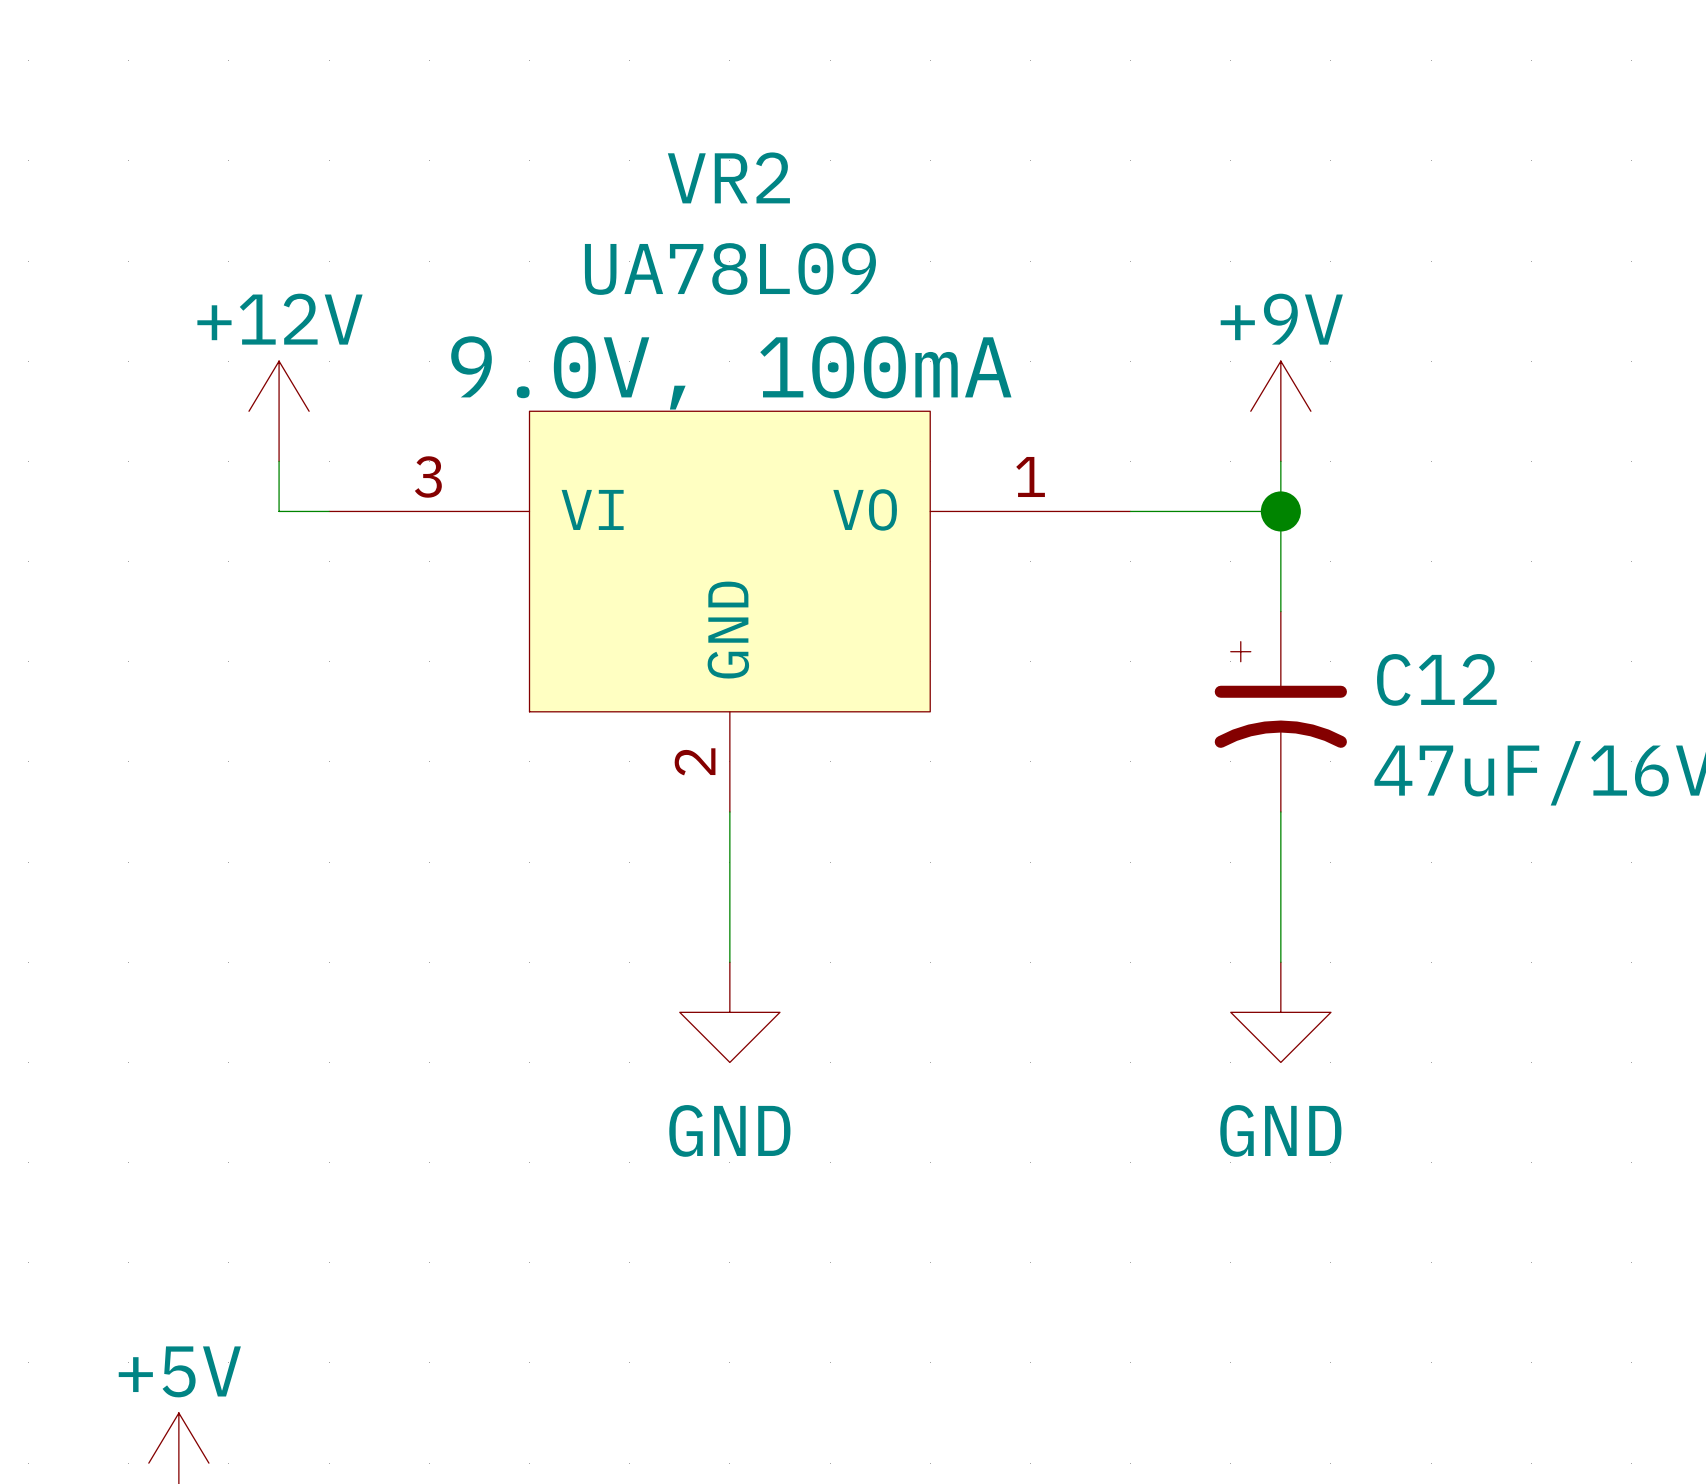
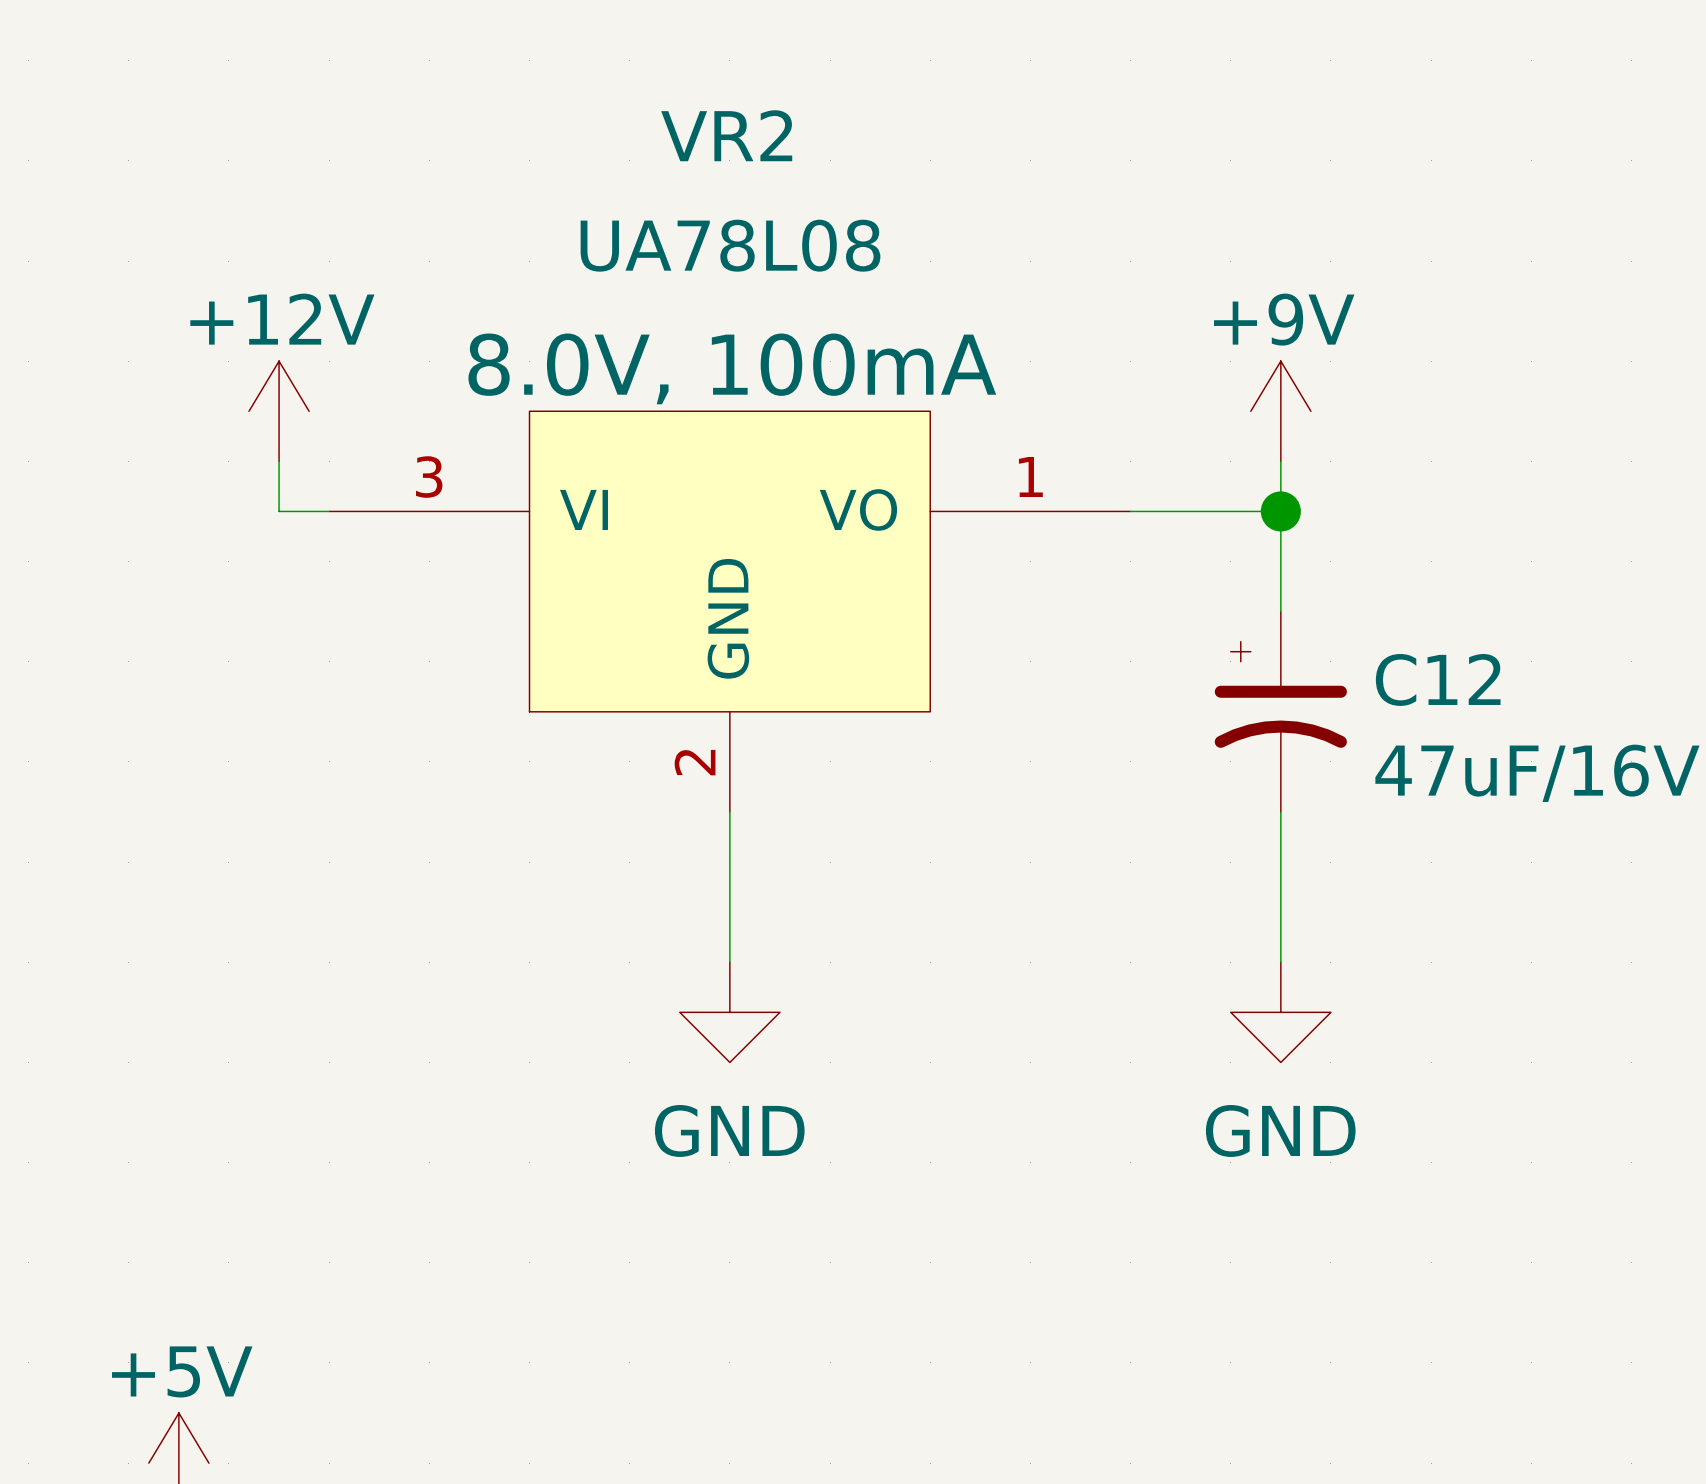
VR2 name position: VR2 (728, 177) -> VR2 (726, 135)
VR2 value: UA78L09 (730, 269) -> UA78L08 (730, 245)
VR2 text: 9.0V, 100mA (731, 372) -> 8.0V, 100mA (732, 368)

